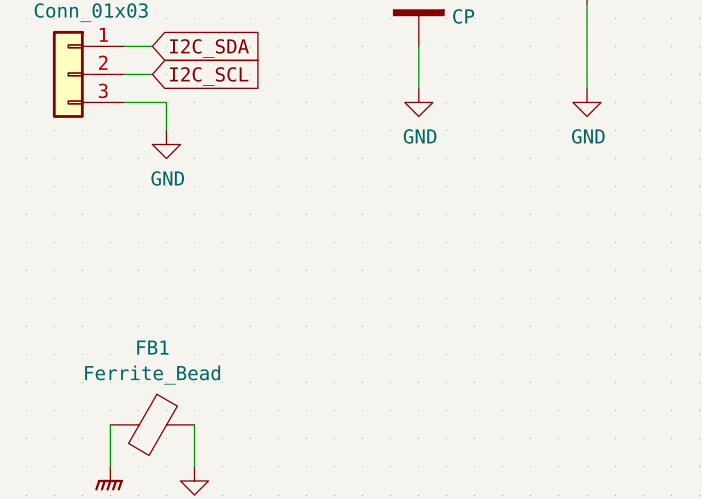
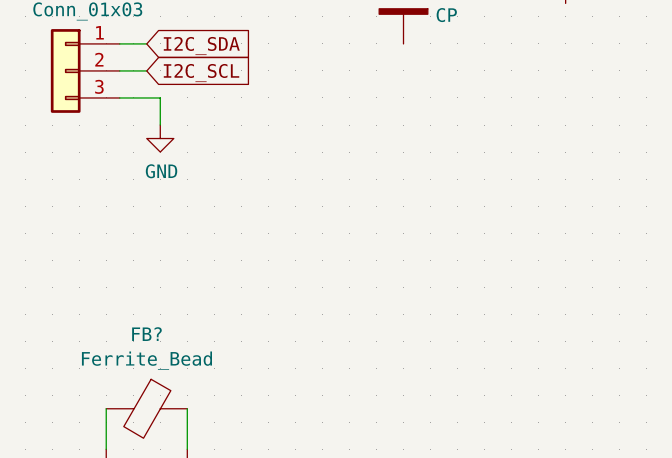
wire: (587, 4) (587, 88) -> none
wire: (418, 46) (418, 88) -> none
power symbol: GND (418, 102) -> none
power symbol: GND (587, 102) -> none
FB1 name: FB1 (152, 347) -> FB? (146, 334)

